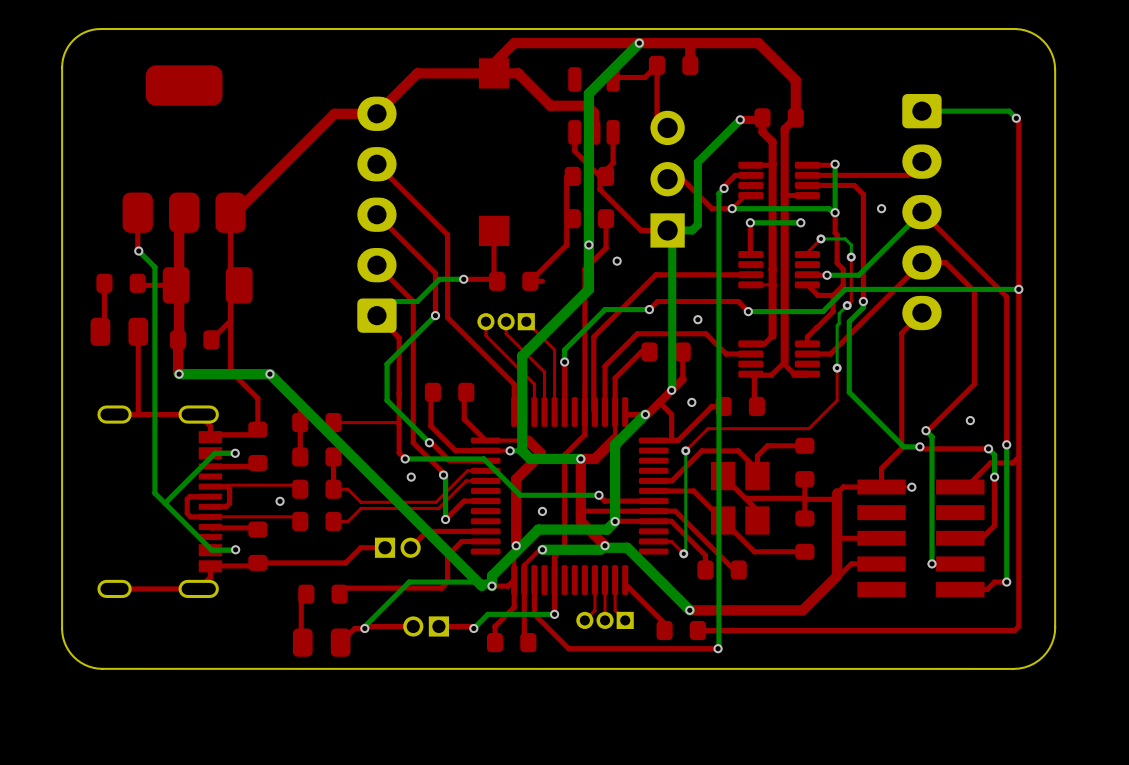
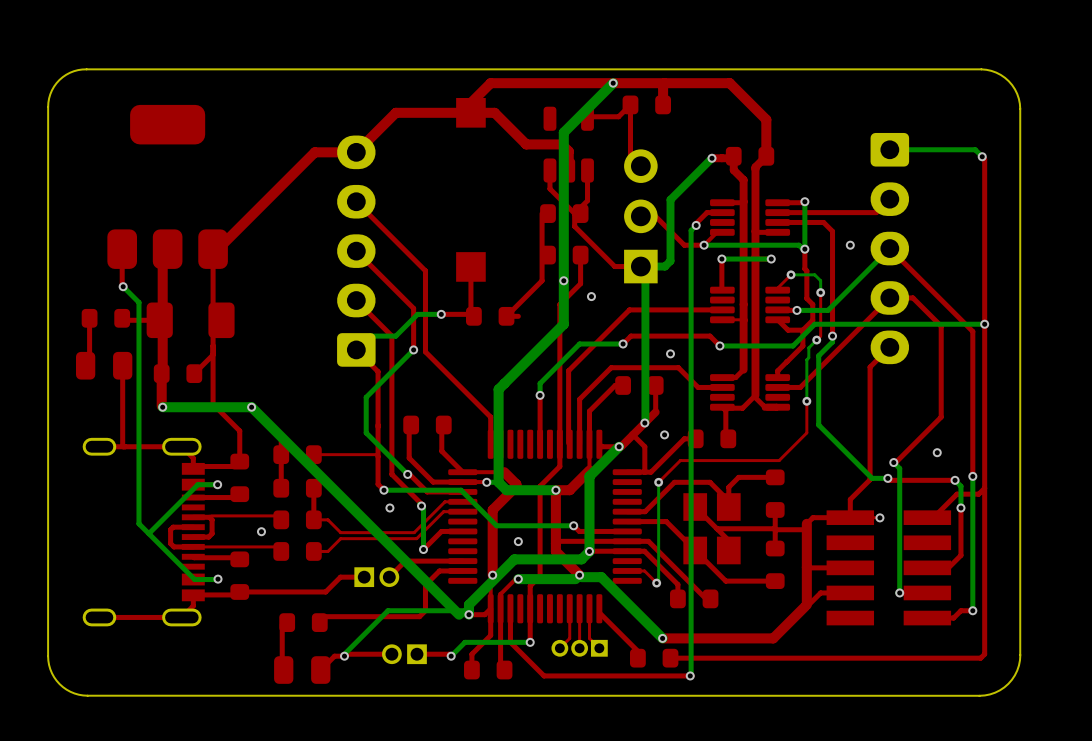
top track: (485, 321) (485, 335) (534, 384) (534, 412) -> none
top track: (506, 321) (506, 333) (544, 372) (544, 412) -> none
part: (506, 321) -> none
top track: (526, 321) (554, 349) (554, 412) -> none

